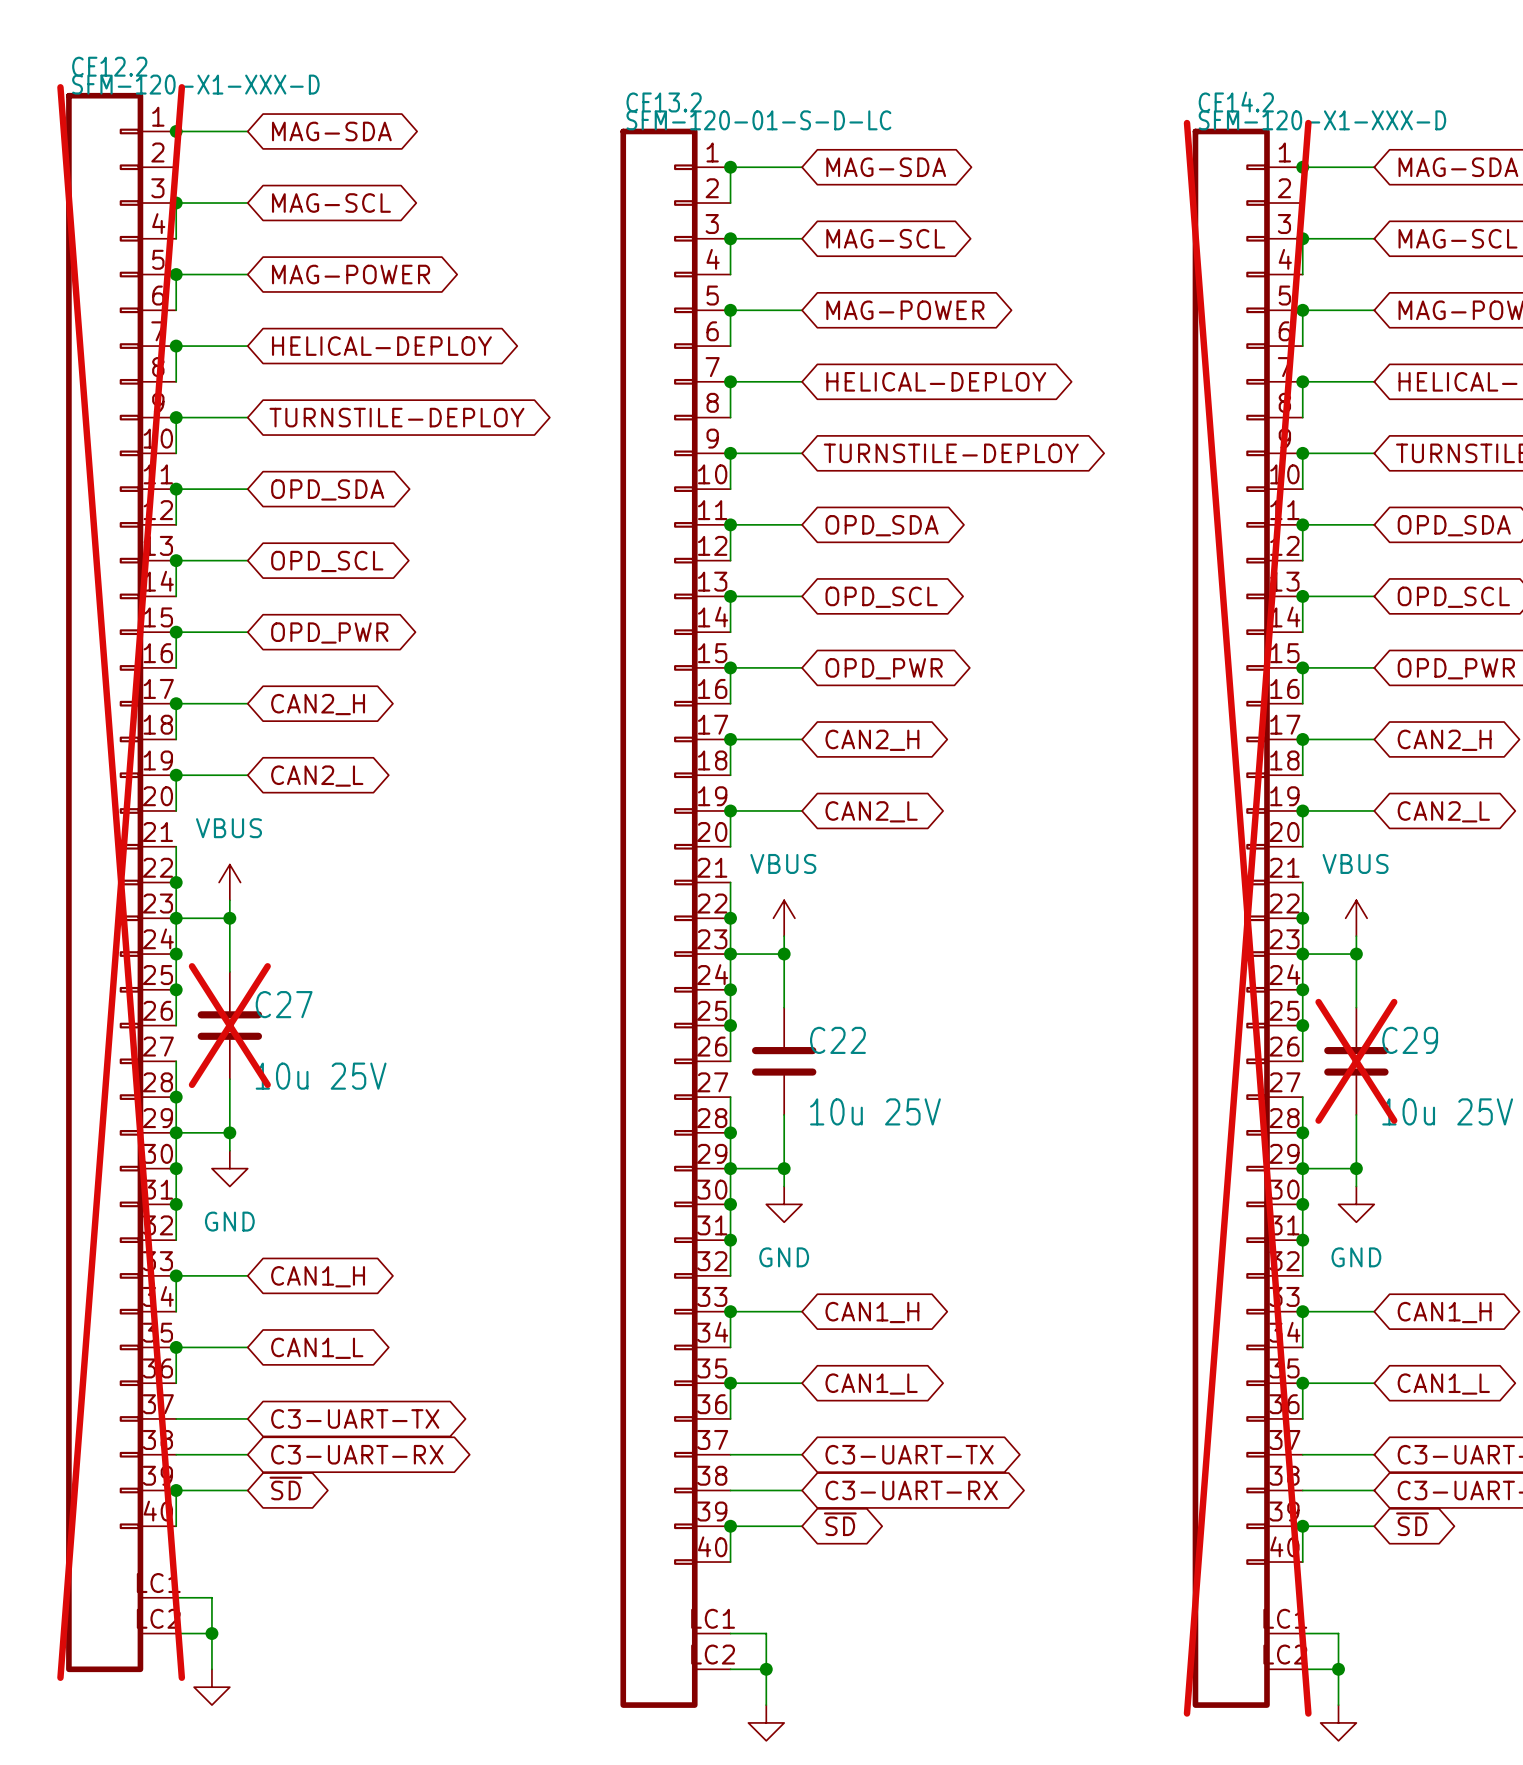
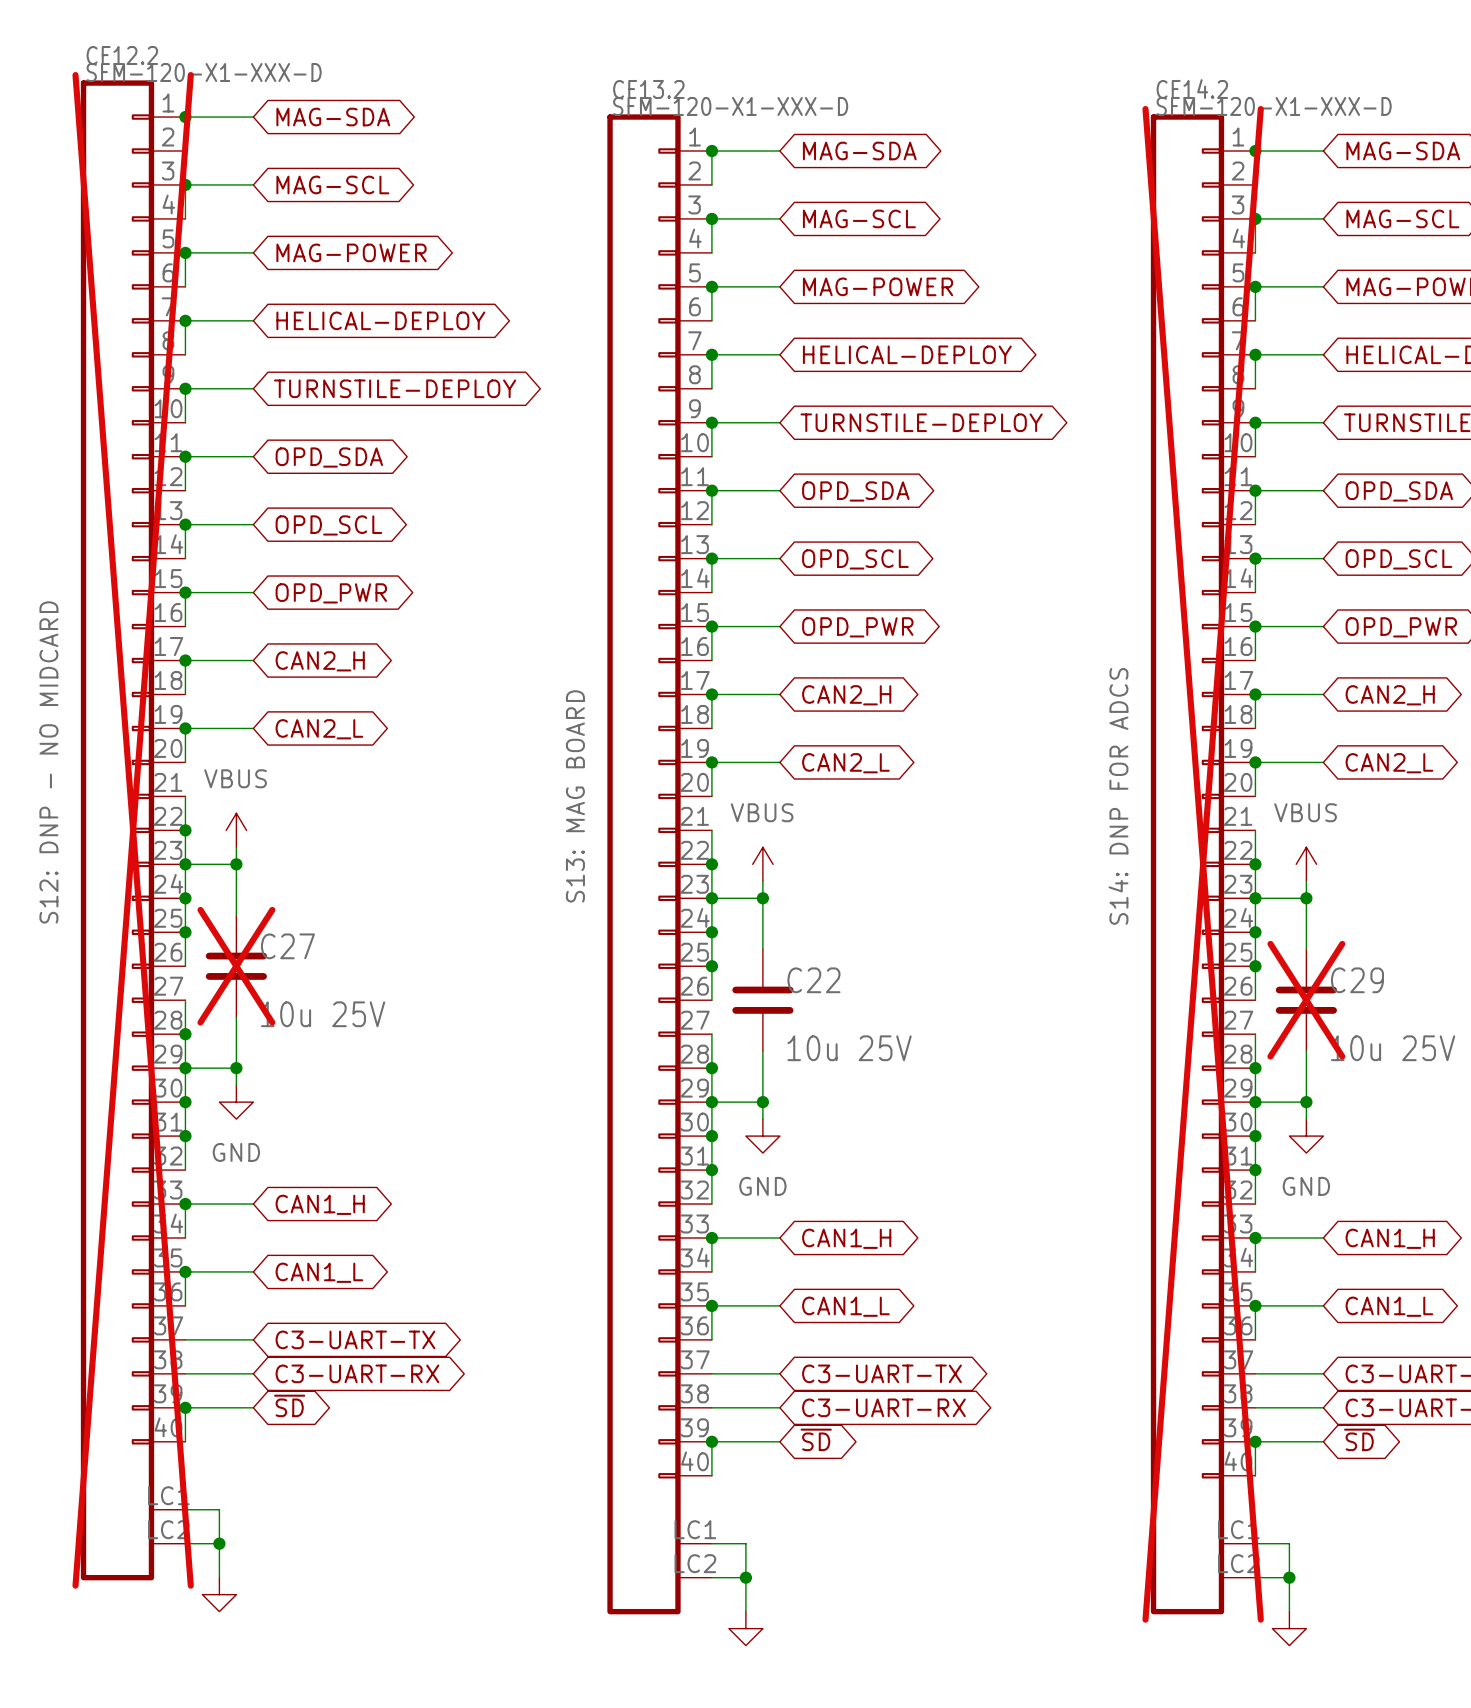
CF13.2 value: SFM-120-01-S-D-LC (758, 120) -> SFM-120-X1-XXX-D (730, 106)
CF12.2 text: none -> S12: DNP - NO MIDCARD (48, 762)
CF13.2 text: none -> S13: MAG BOARD (575, 796)
CF14.2 text: none -> S14: DNP FOR ADCS (1118, 796)

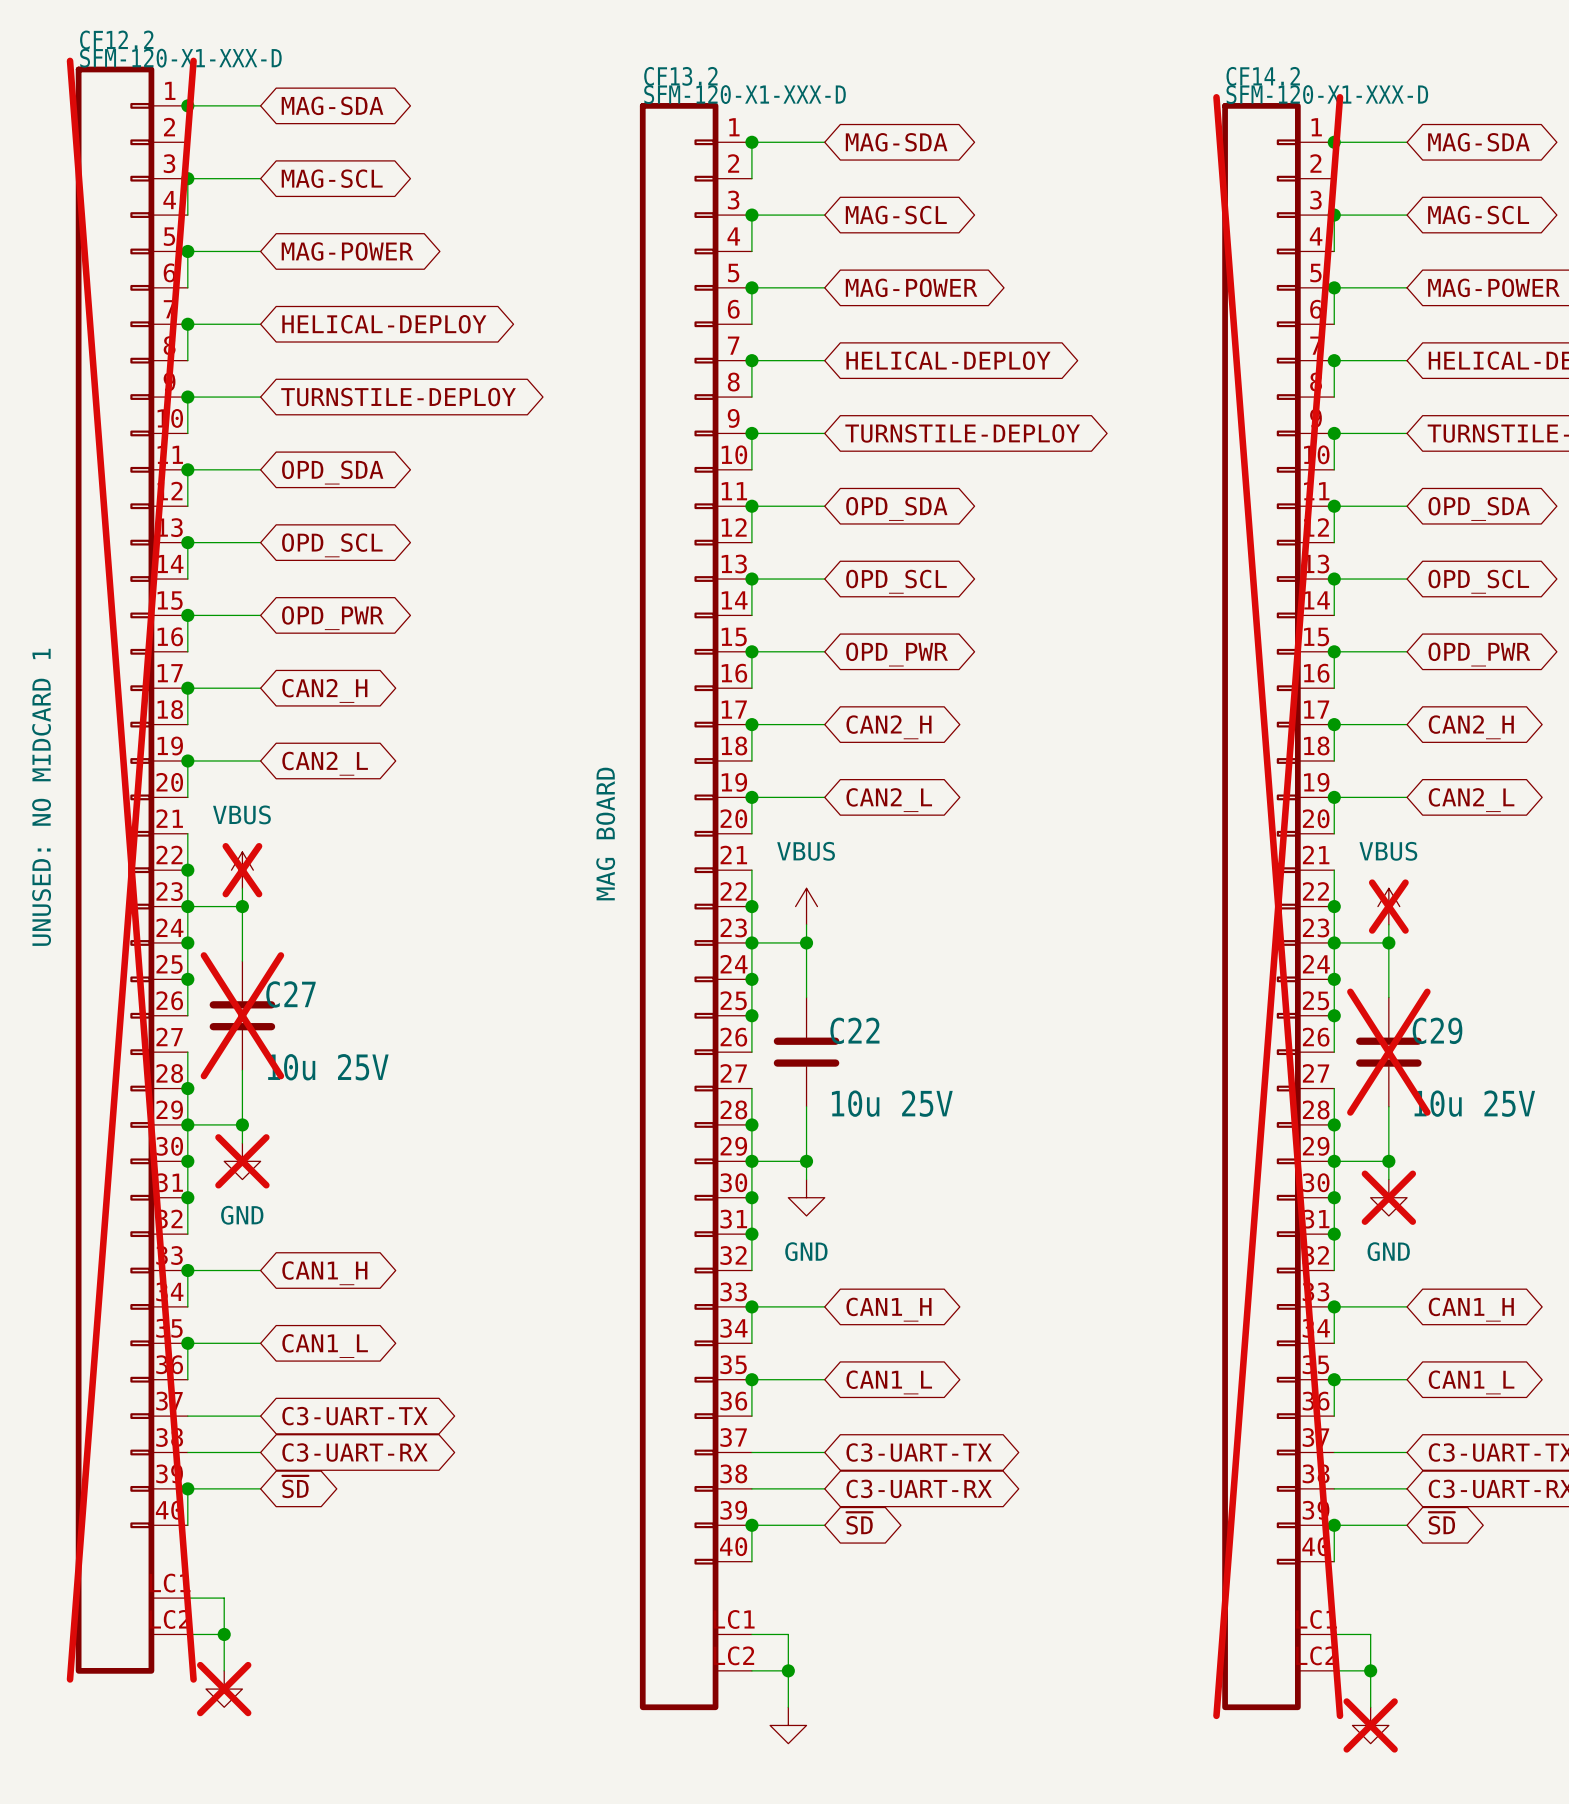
CF12.2 text: S12: DNP - NO MIDCARD (48, 762) -> UNUSED: NO MIDCARD 1 (41, 797)
CF13.2 text: S13: MAG BOARD (575, 796) -> MAG BOARD (605, 834)
CF14.2 text: S14: DNP FOR ADCS (1118, 796) -> none
power symbol do-not-place cross: none -> (242, 870)
power symbol do-not-place cross: none -> (1388, 906)
power symbol do-not-place cross: none -> (242, 1161)
power symbol do-not-place cross: none -> (1388, 1197)
power symbol do-not-place cross: none -> (224, 1689)
power symbol do-not-place cross: none -> (1370, 1725)

